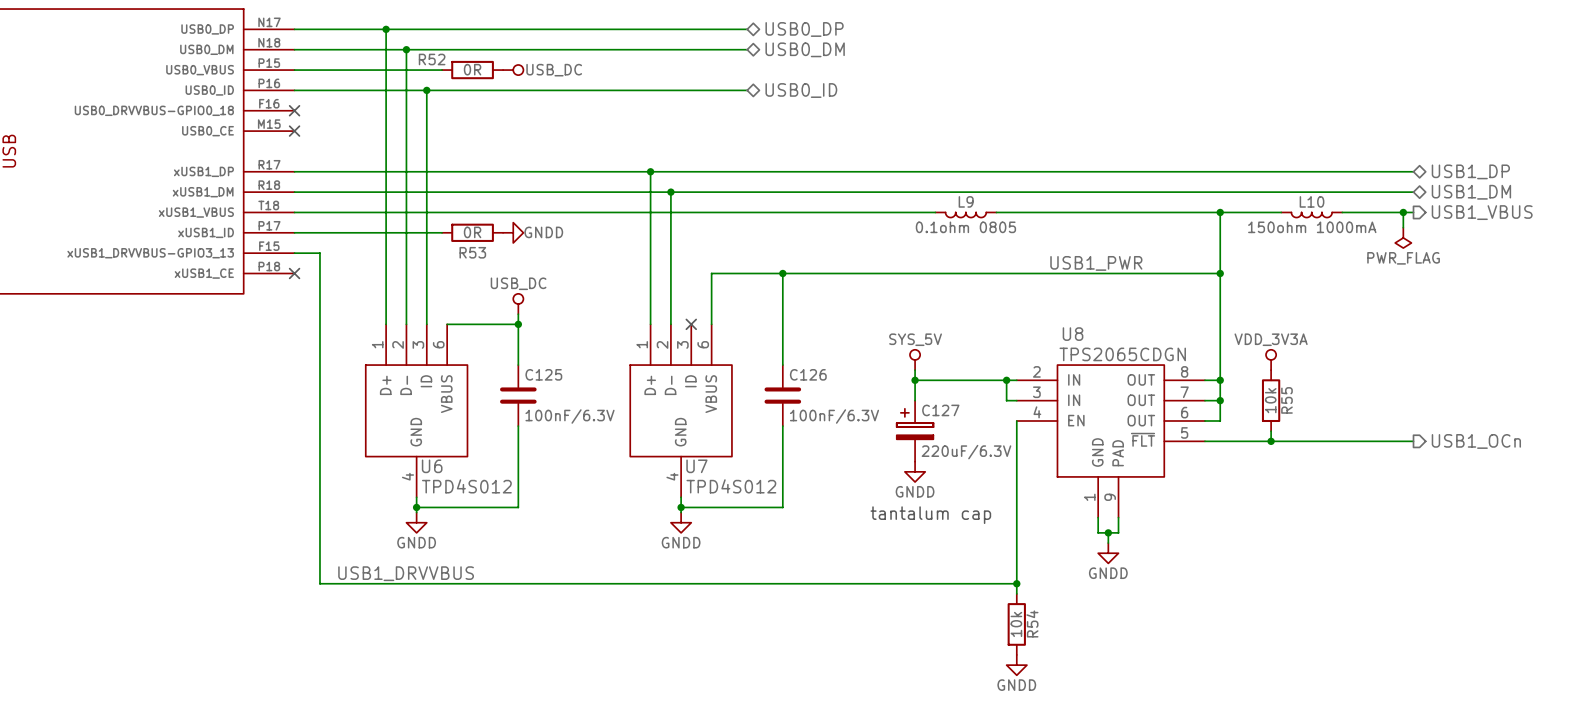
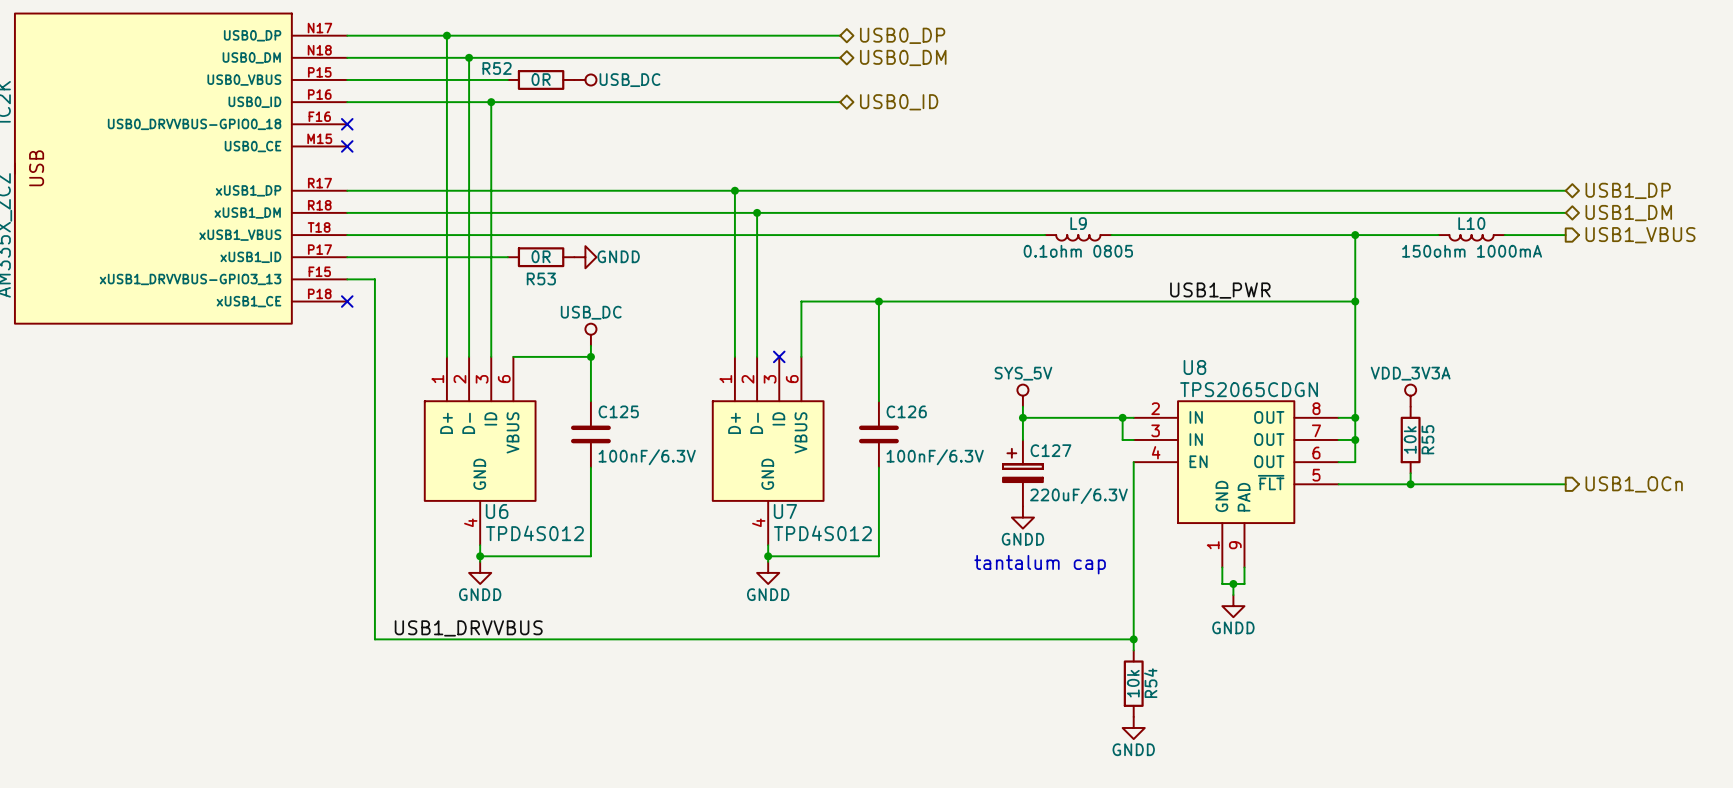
wire: (1403, 212) (1403, 227) -> none
junction: (1403, 212) -> none
L10 position: (1311, 215) -> (1471, 237)
power symbol: PWR_FLAG (1403, 237) -> none

